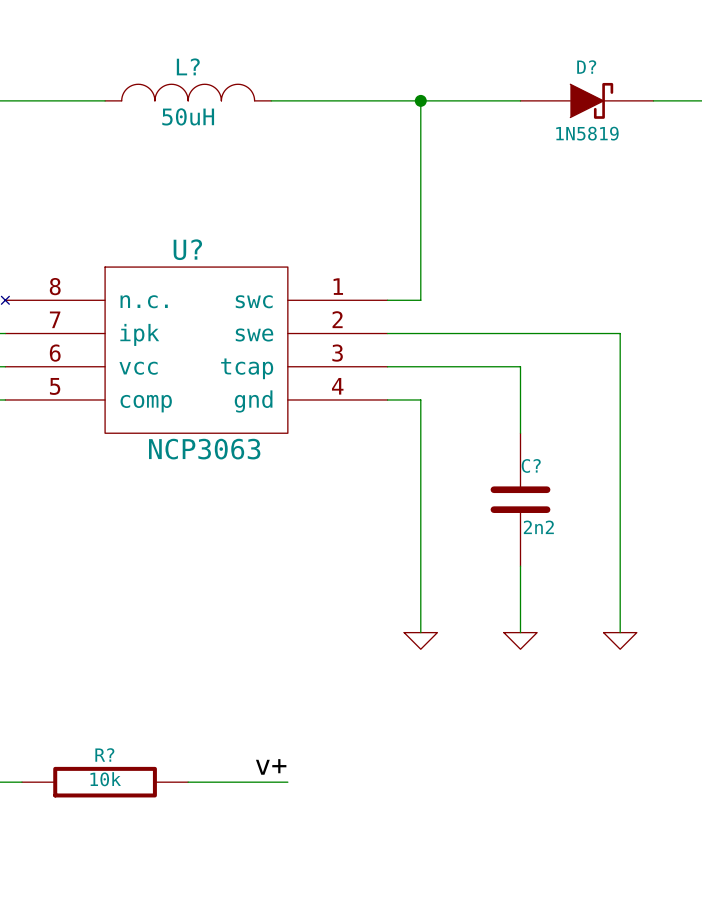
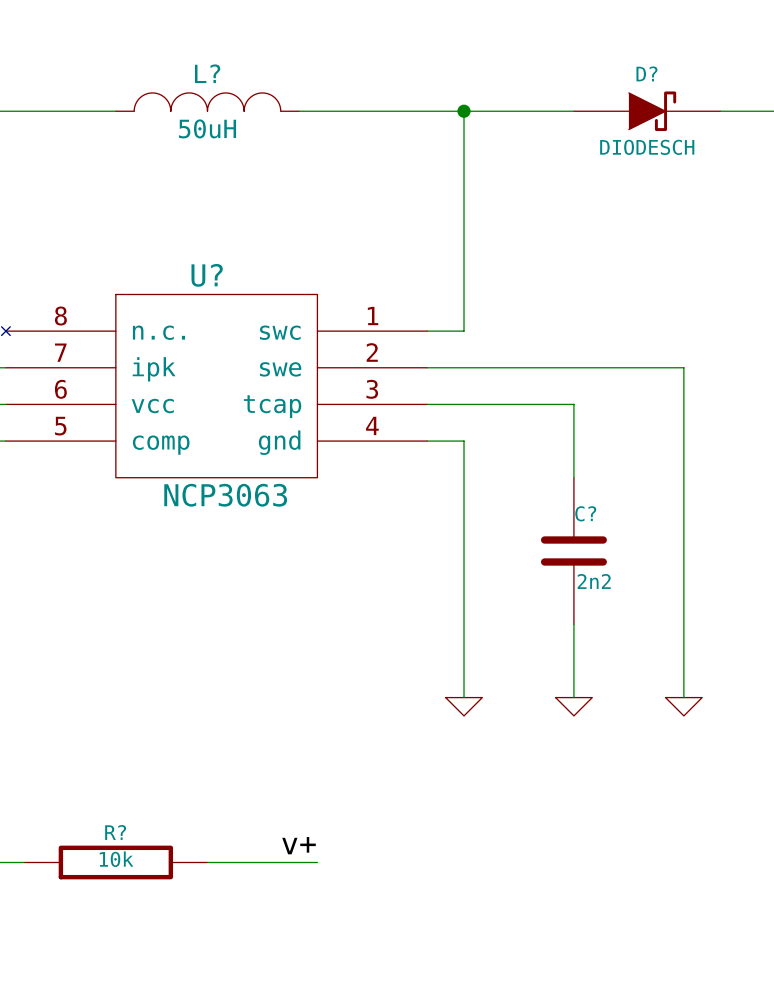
D? value: 1N5819 (587, 133) -> DIODESCH (647, 147)

